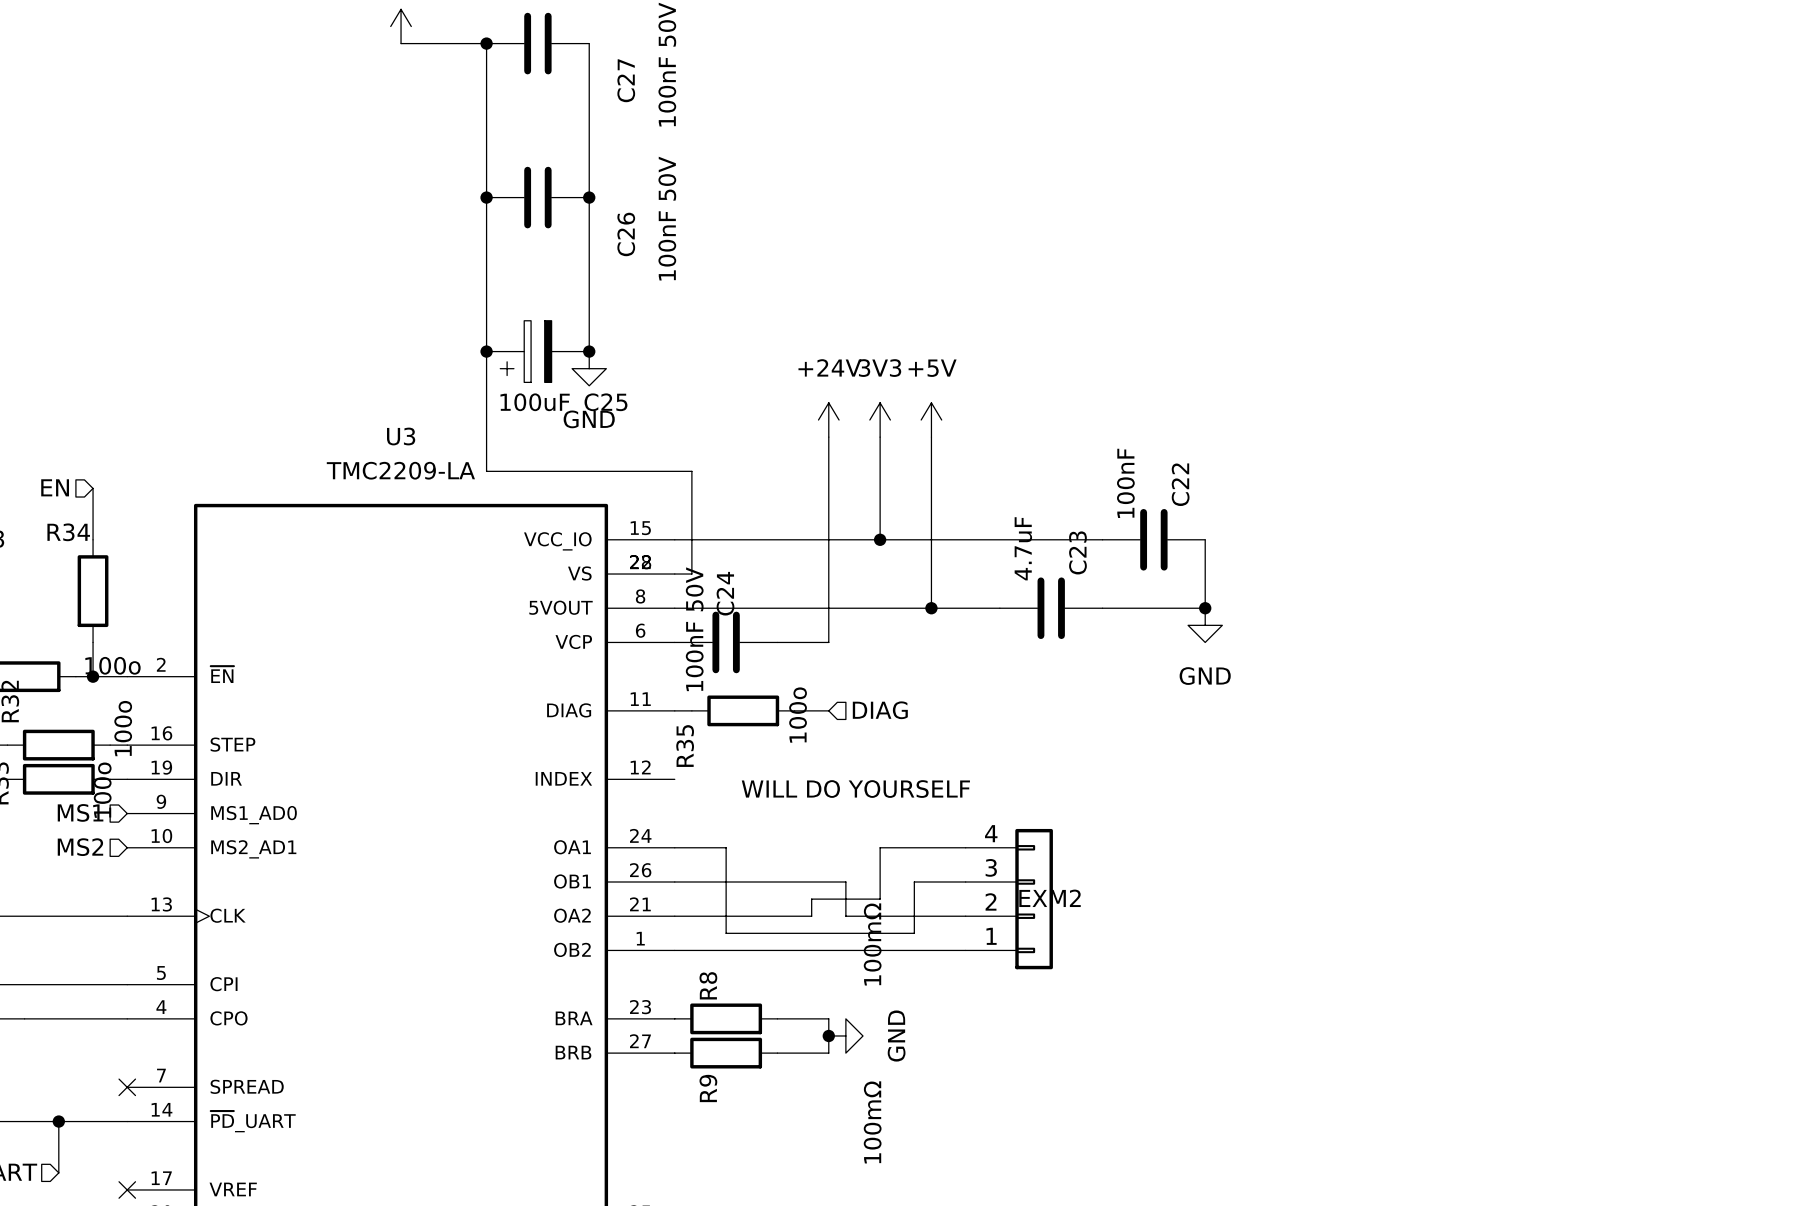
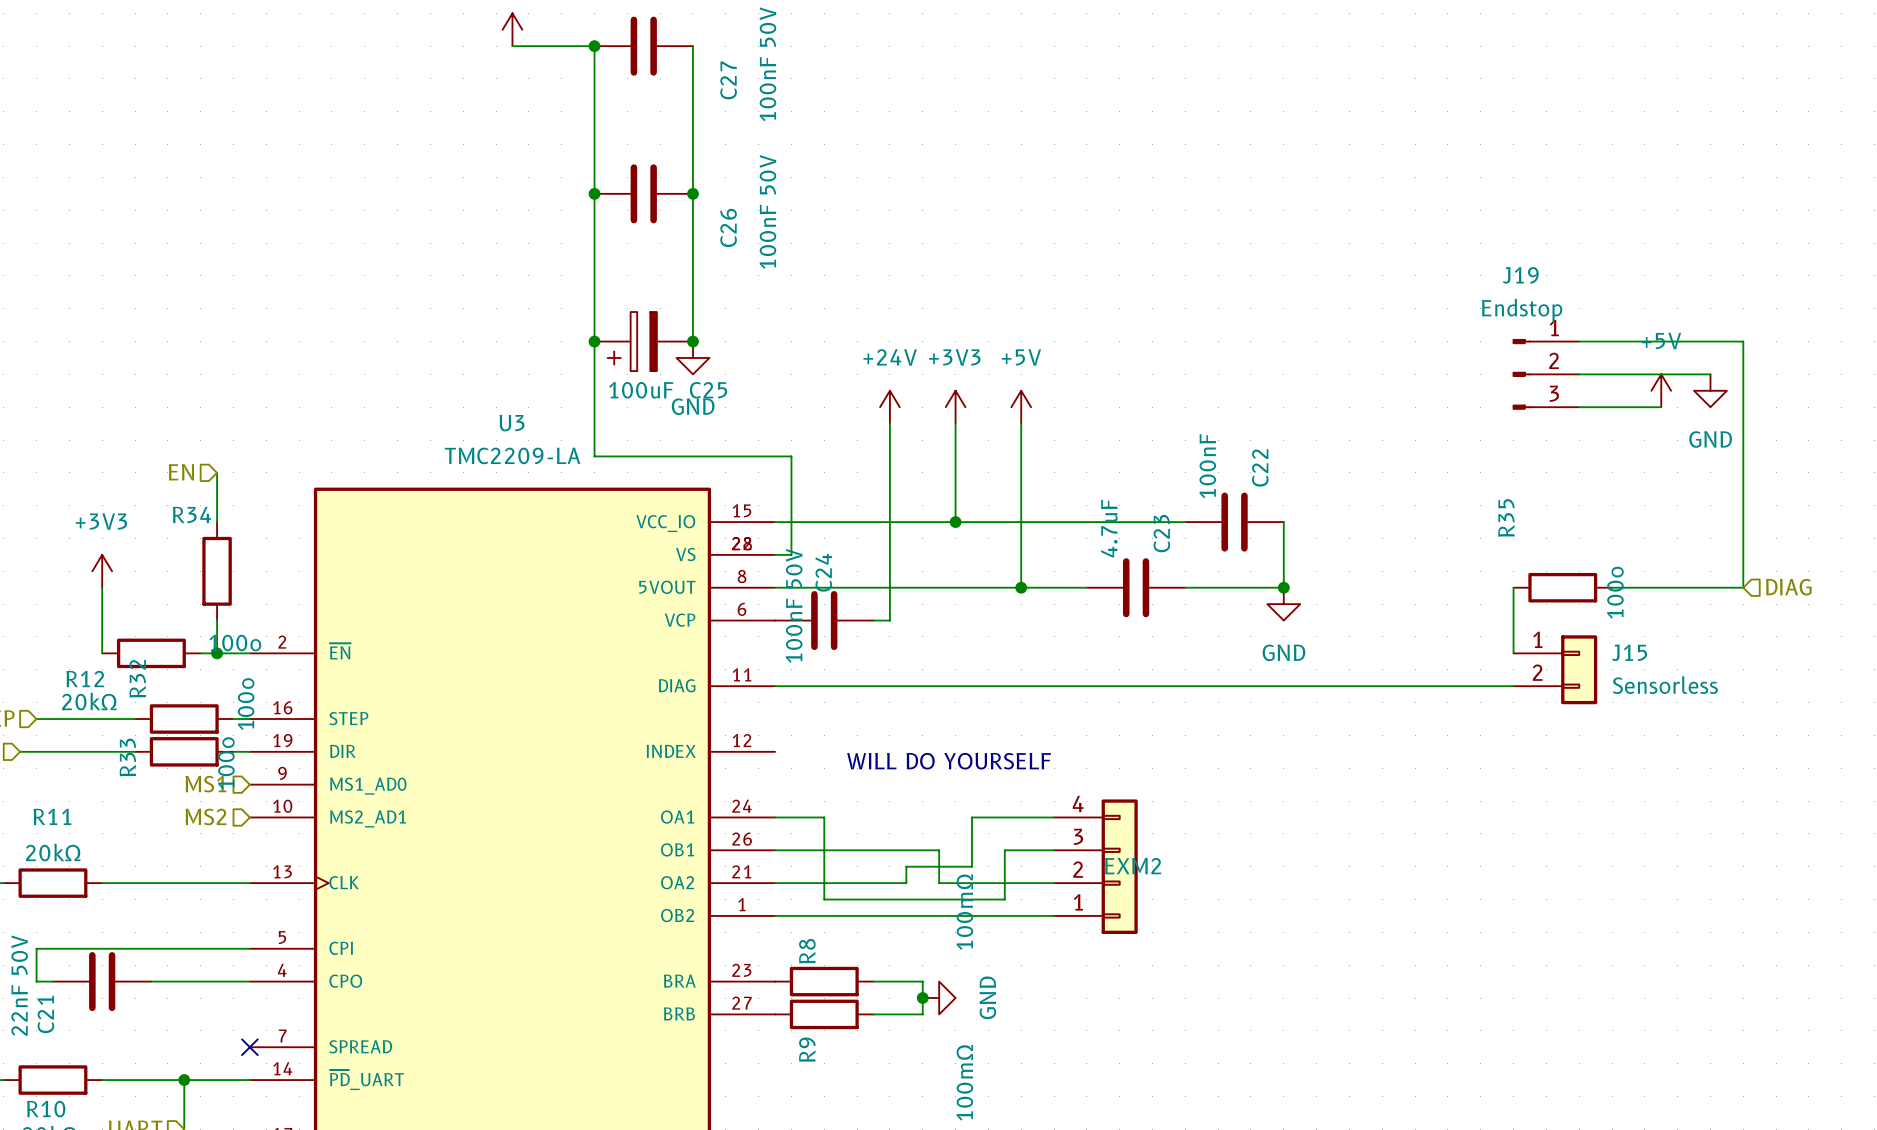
wire: none -> (1579, 341) (1743, 341) (1743, 587) (1612, 587)
J19: none -> Endstop (1545, 374)
wire: none -> (1579, 374) (1710, 374)
power symbol: none -> +5V (1661, 390)
power symbol: none -> GND (1710, 390)
power symbol position: +24V (828, 420) -> +24V (889, 407)
power symbol: none -> +3V3 (955, 407)
power symbol: 3V3 (880, 420) -> none
wire: none -> (1579, 407) (1661, 407)
wire: (828, 437) (828, 642) (794, 642) -> (889, 423) (889, 620)
wire: (880, 437) (880, 539) -> (955, 423) (955, 522)
junction position: (880, 539) -> (955, 522)
hierarchical label: none -> DIAG (1788, 587)
wire: none -> (1513, 587) (1513, 653)
J15: none -> Sensorless (1555, 669)
wire: none -> (791, 686) (889, 686)
R35 position: (743, 710) -> (1562, 587)
wire: none -> (922, 686) (1513, 686)
hierarchical label: DIAG (880, 710) -> none
R35 name position: R35 (685, 746) -> R35 (1506, 517)

